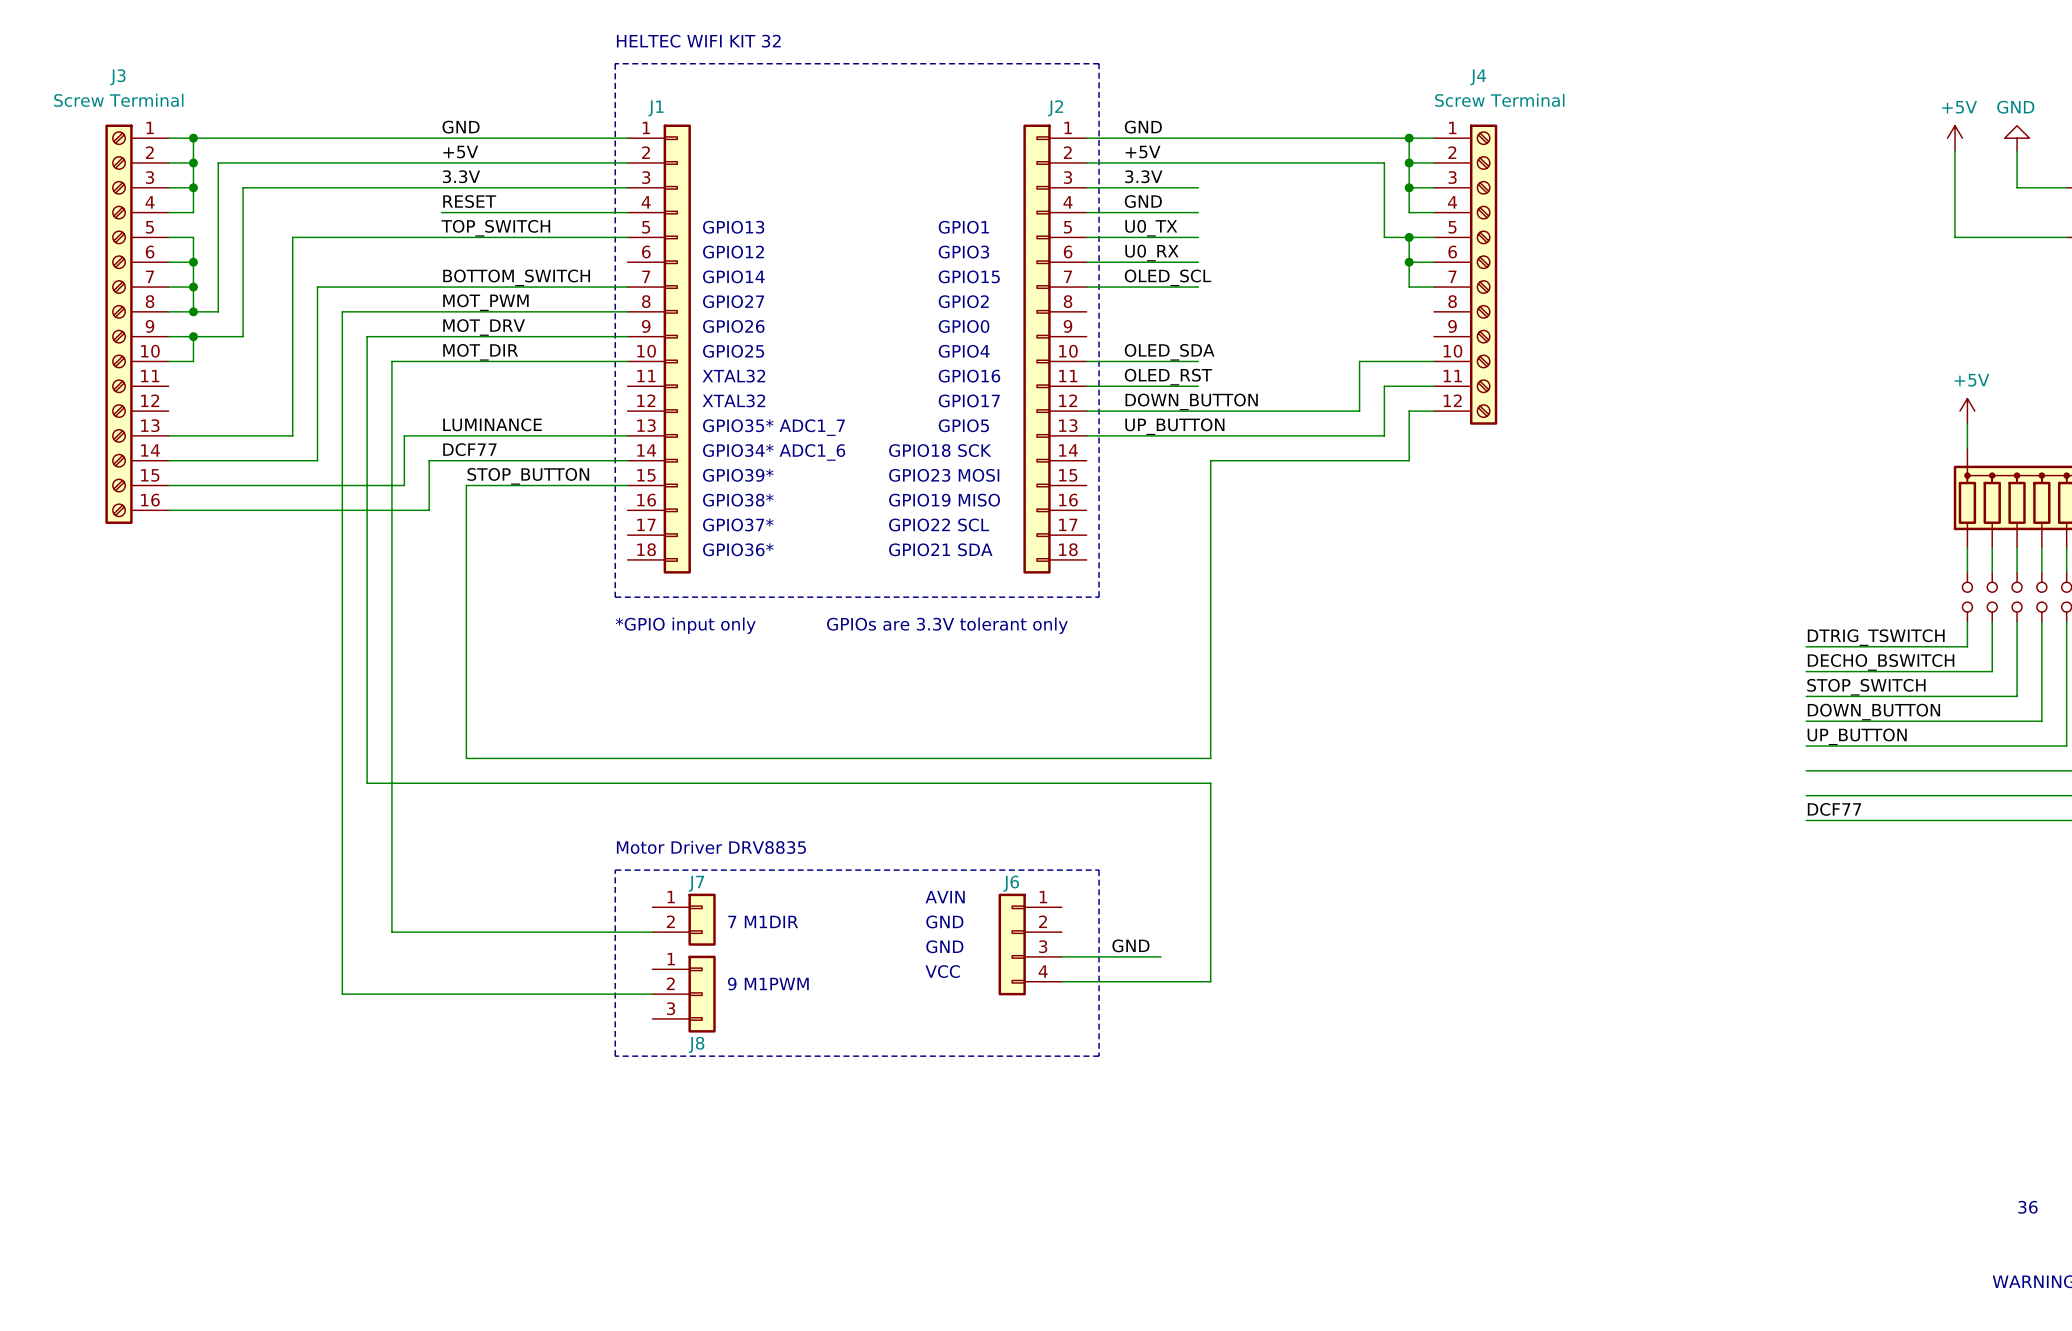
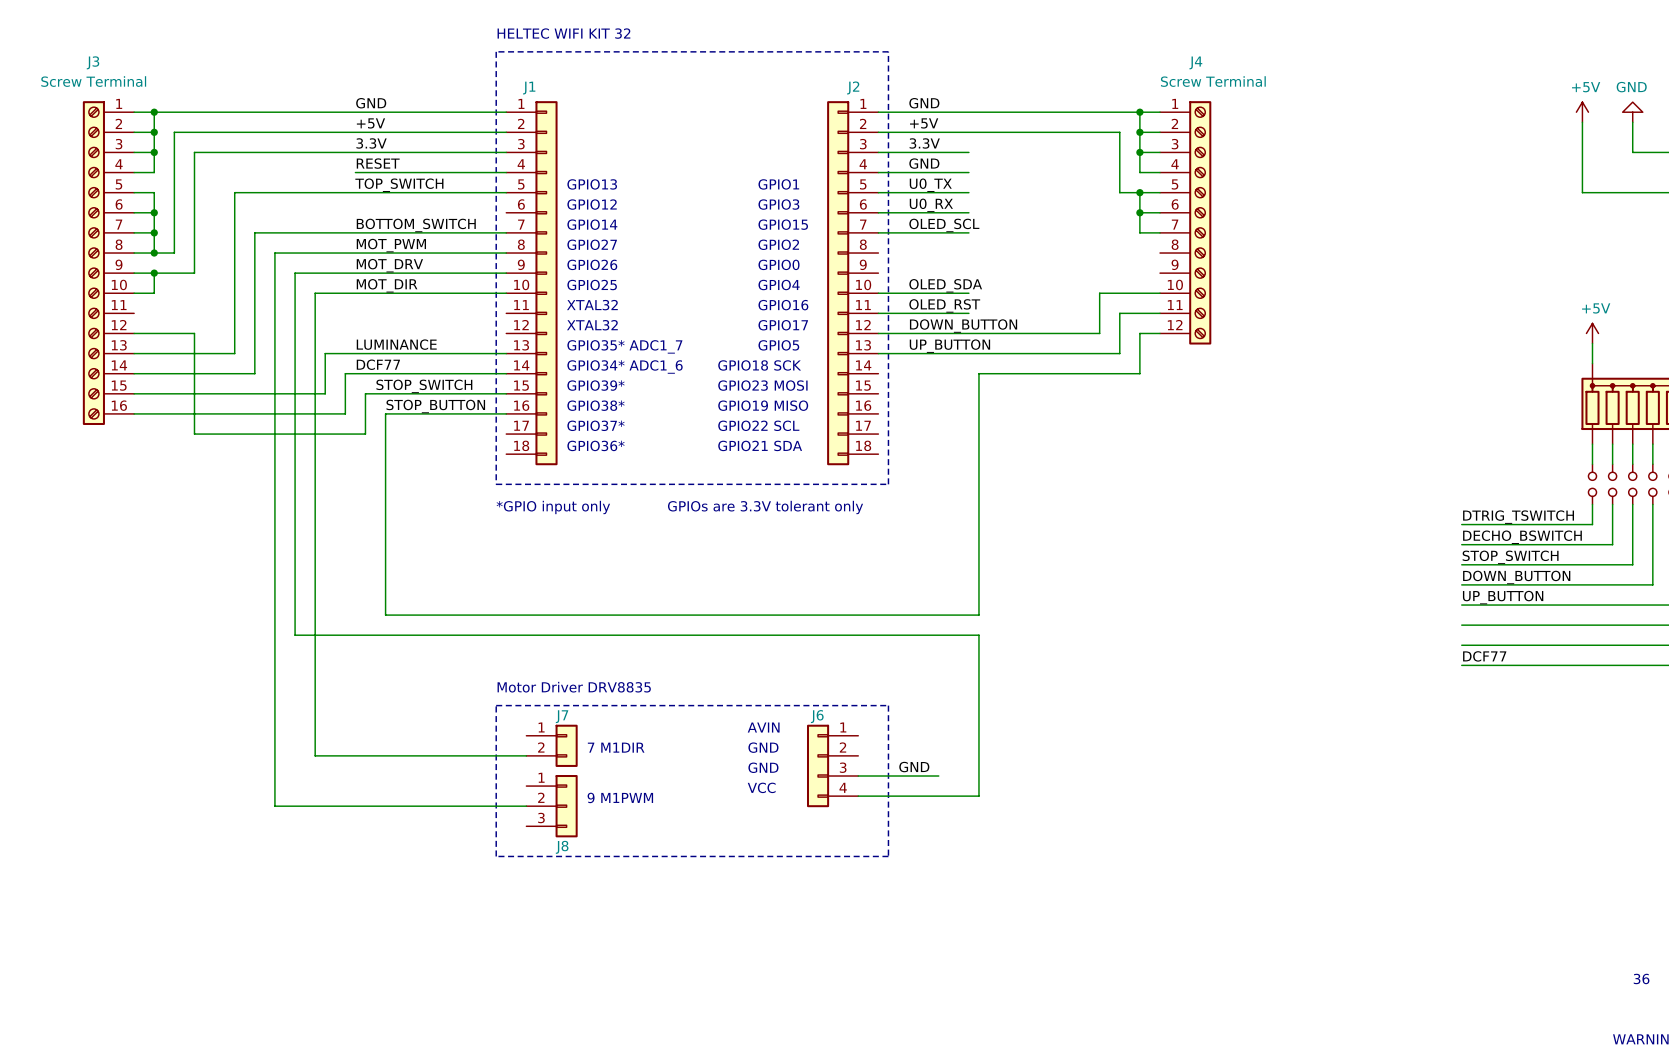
wire: none -> (134, 333) (194, 333) (194, 434) (365, 434) (365, 393) (375, 393)
label: STOP_BUTTON (528, 476) -> STOP_SWITCH (424, 386)
wire: (466, 485) (466, 758) (478, 758) -> (506, 413) (385, 413) (385, 615)
label: none -> STOP_BUTTON (435, 406)

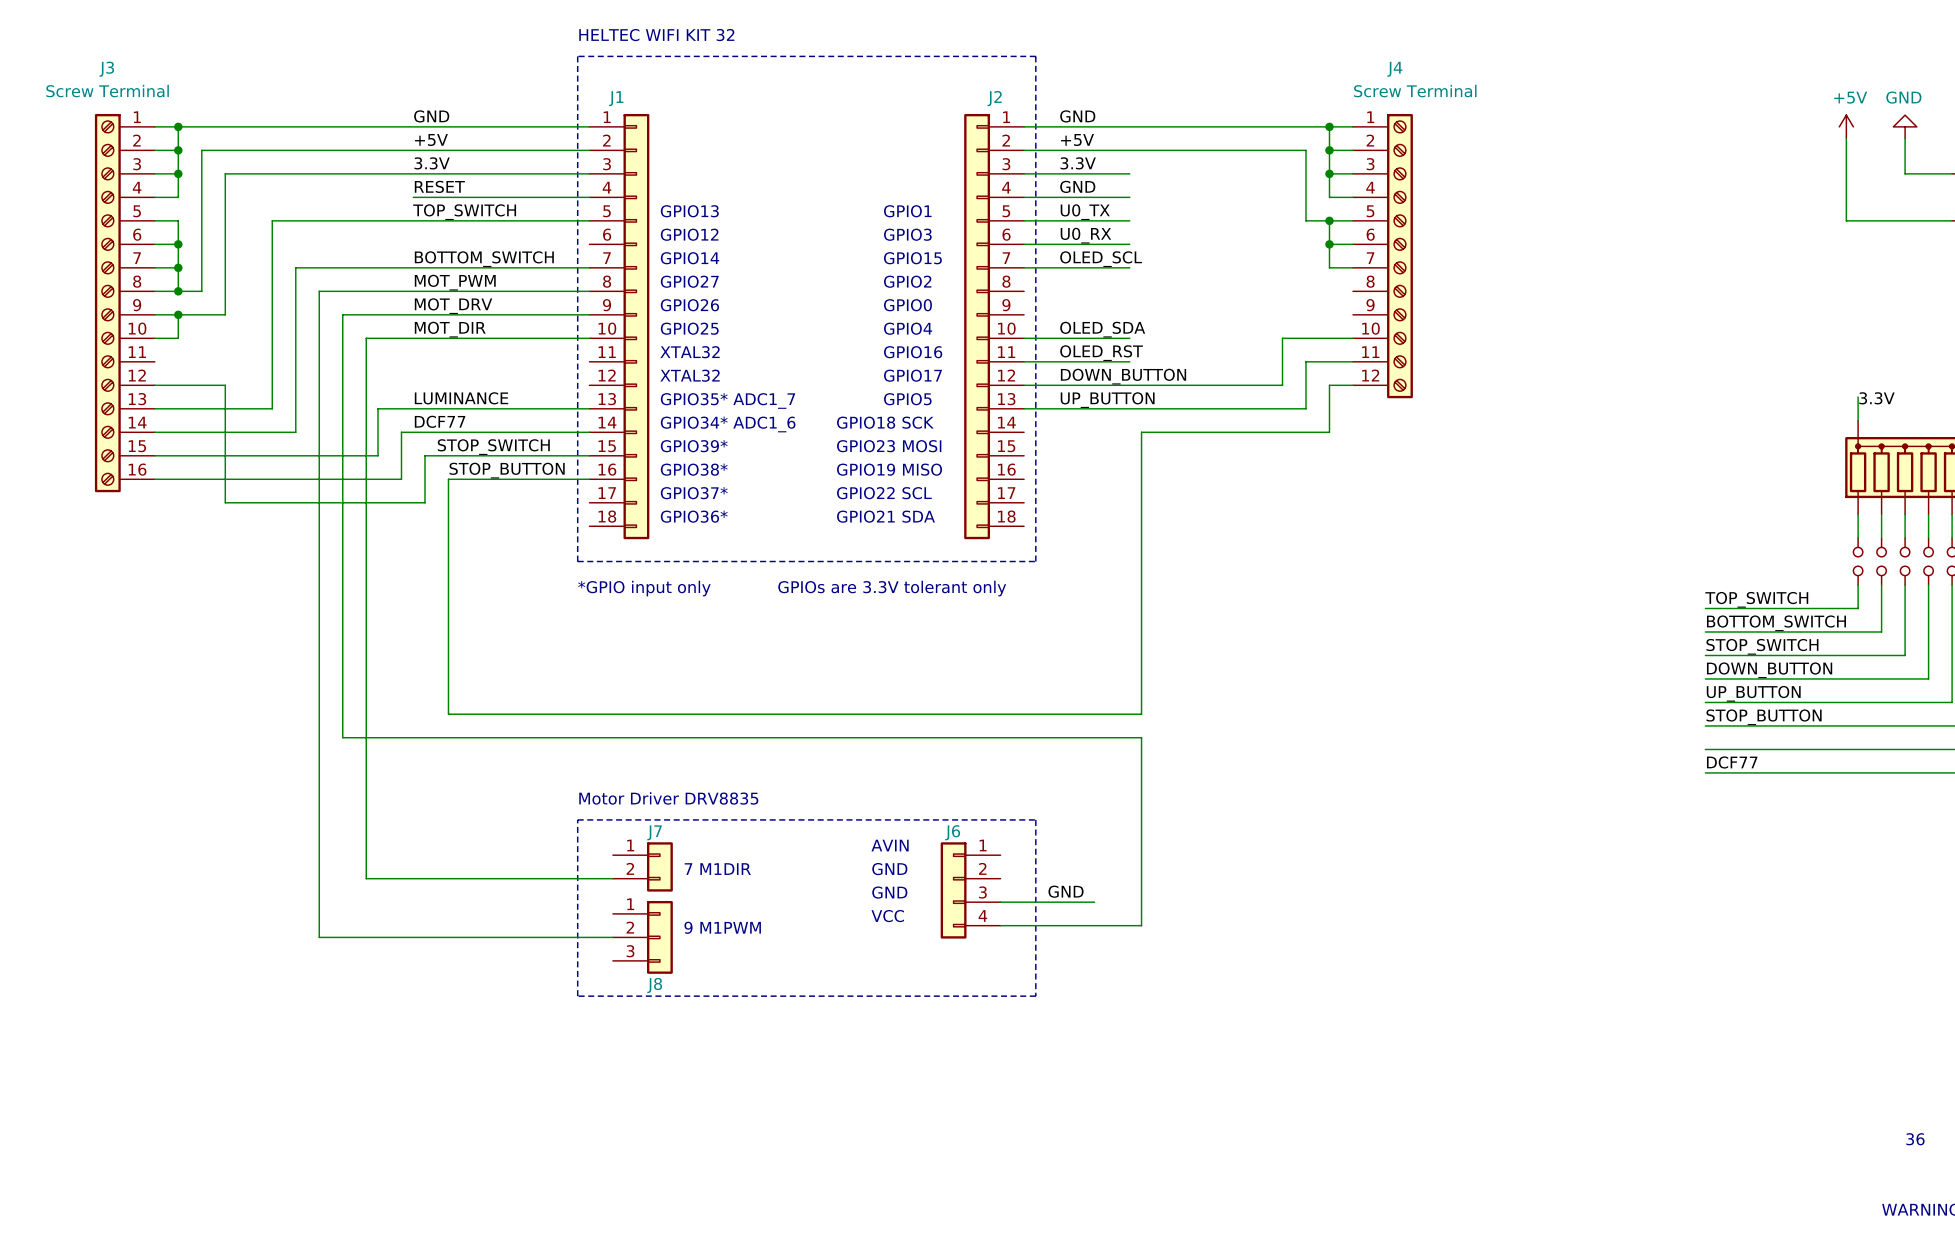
power symbol: +5V (1592, 333) -> none
label: none -> 3.3V (1876, 398)
label: DTRIG_TSWITCH (1518, 517) -> TOP_SWITCH (1756, 599)
label: DECHO_BSWITCH (1522, 537) -> BOTTOM_SWITCH (1776, 623)
label: none -> STOP_BUTTON (1764, 717)

